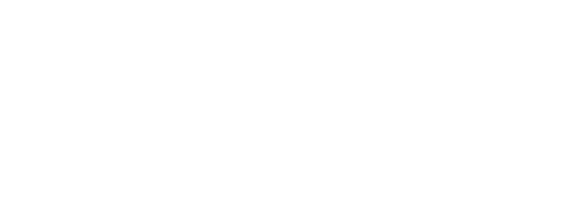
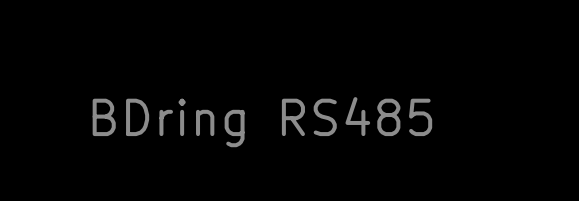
text: none -> BDring RS485 (262, 122)

